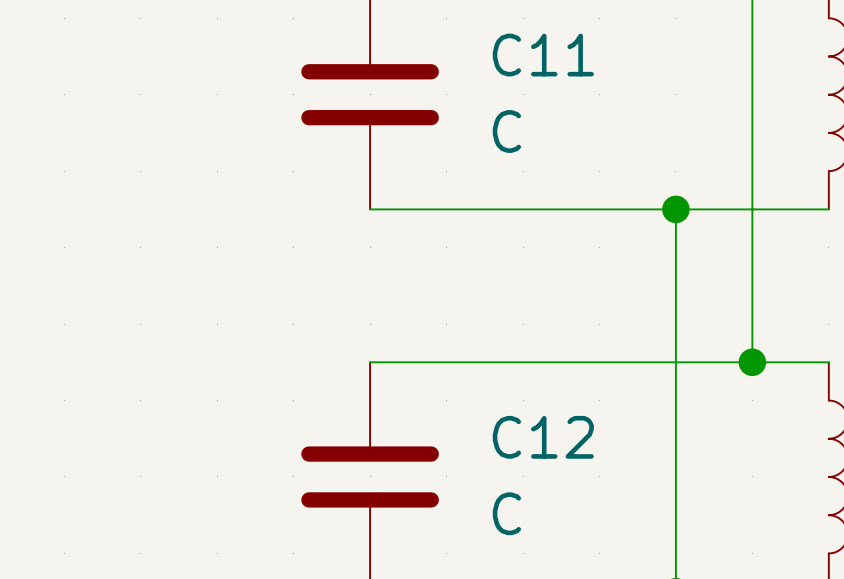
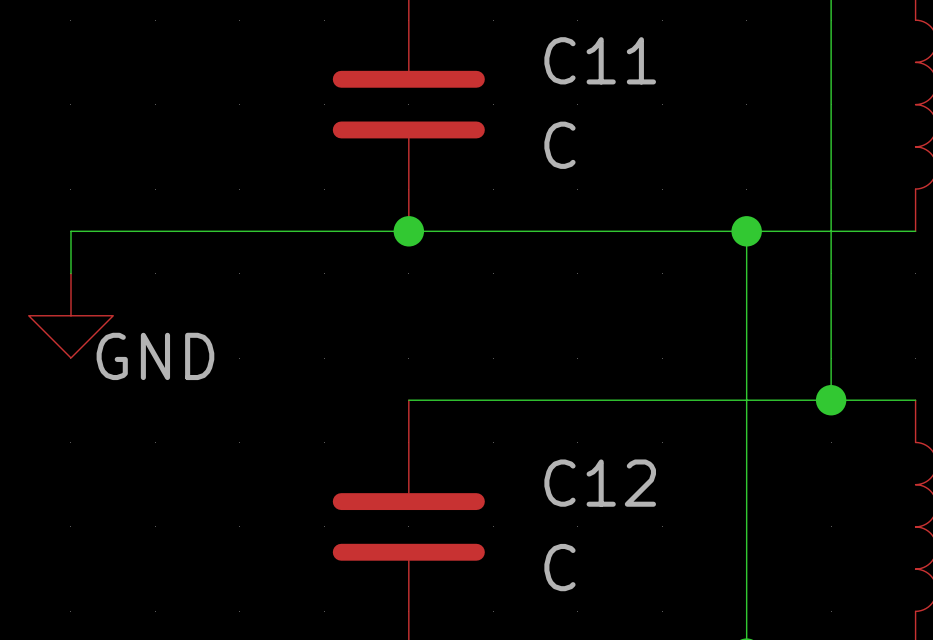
wire: none -> (408, 231) (70, 231) (70, 273)
junction: none -> (408, 231)
power symbol: none -> GND (70, 315)

